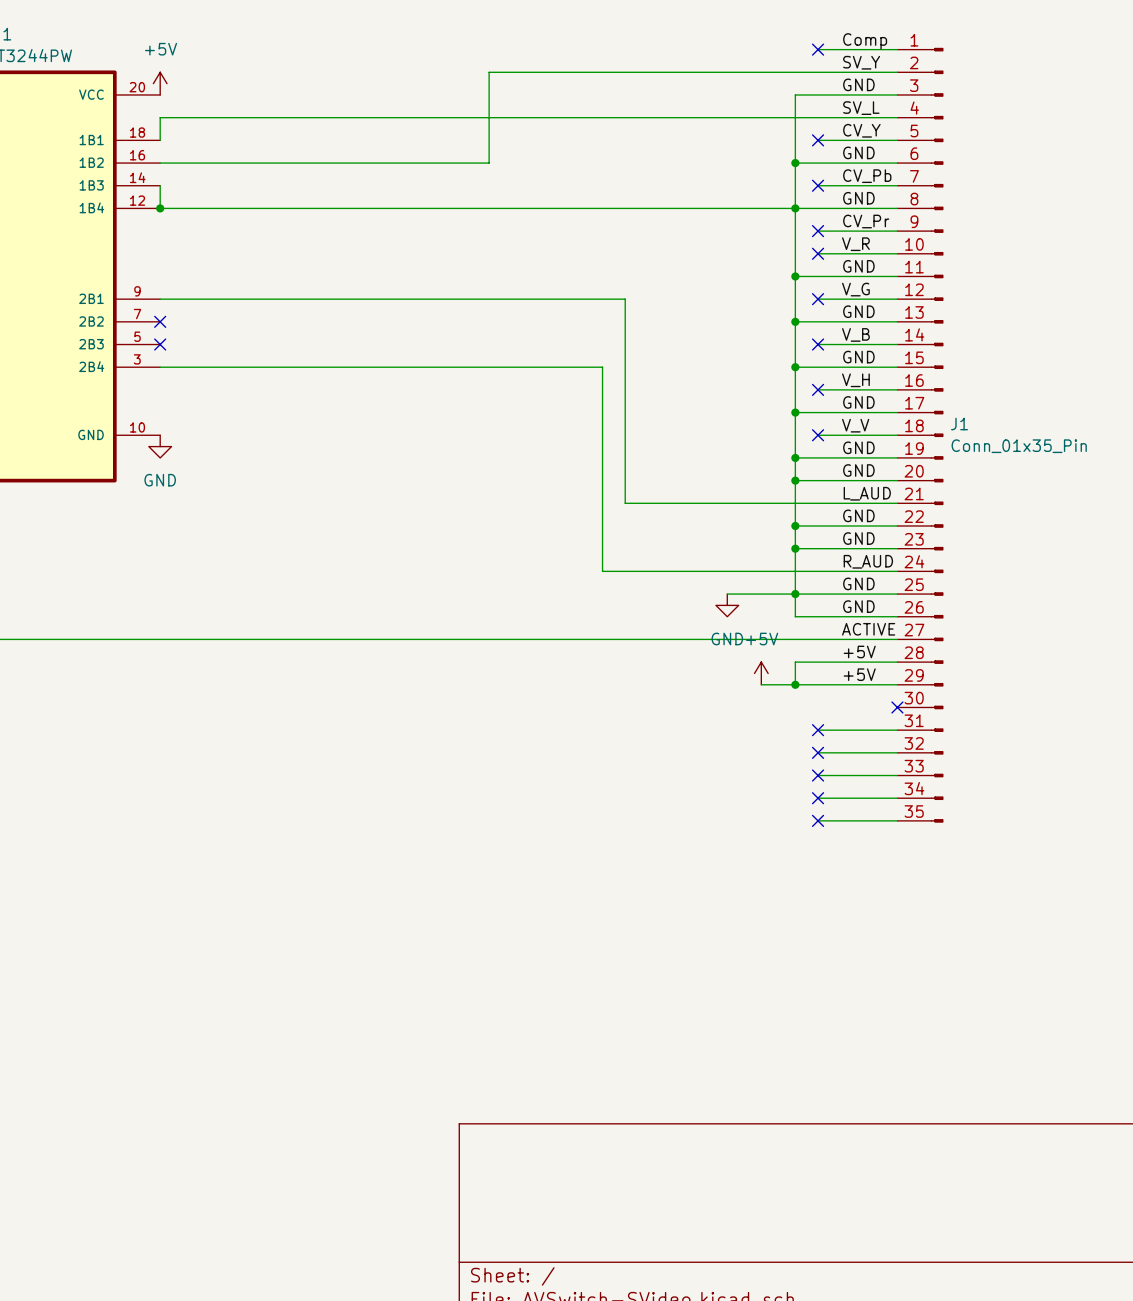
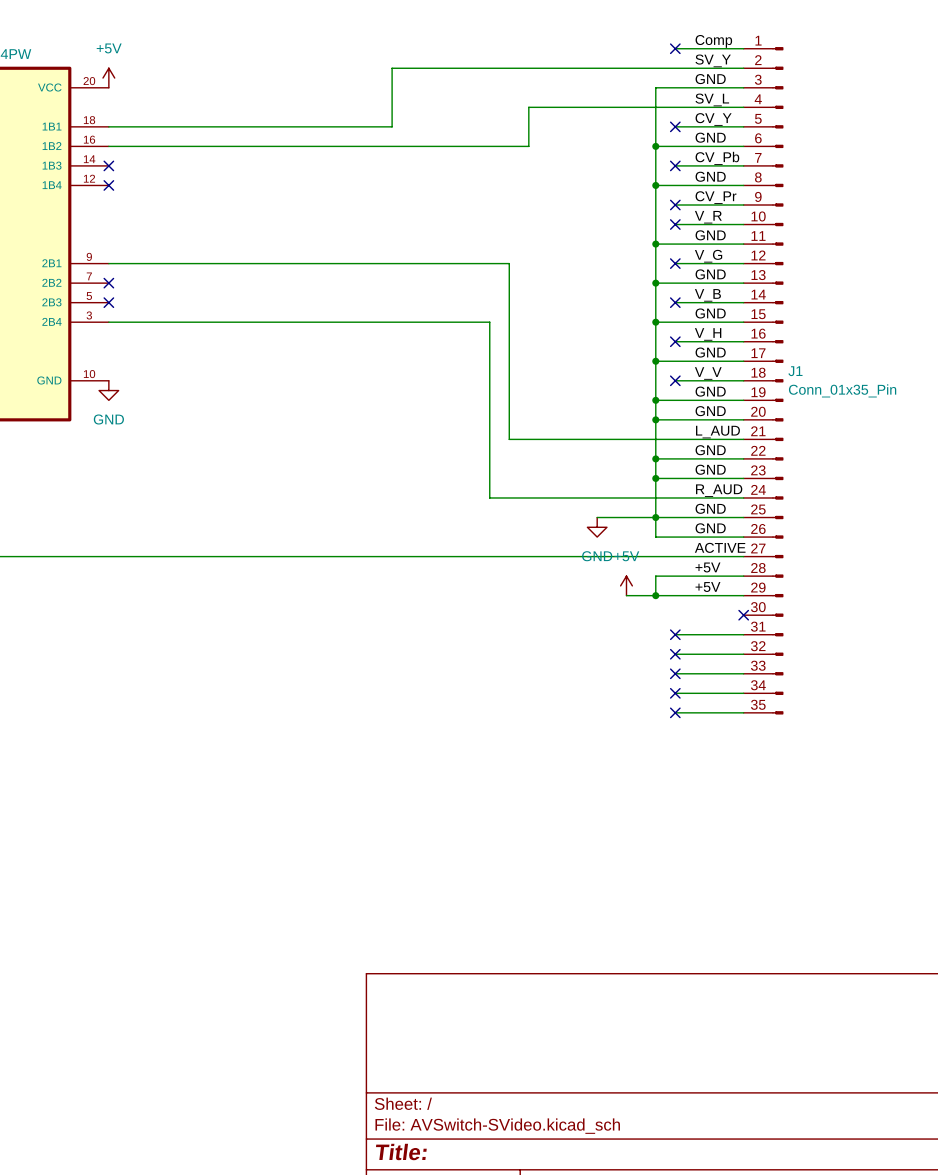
wire: (647, 117) (160, 117) (160, 140) -> (392, 126) (108, 126)
wire: (489, 140) (489, 163) -> (528, 107) (528, 146) (392, 146)
wire: (160, 185) (160, 208) (795, 208) -> none
no-connect mark: none -> (108, 165)
junction: (160, 208) -> none
no-connect mark: none -> (108, 185)

